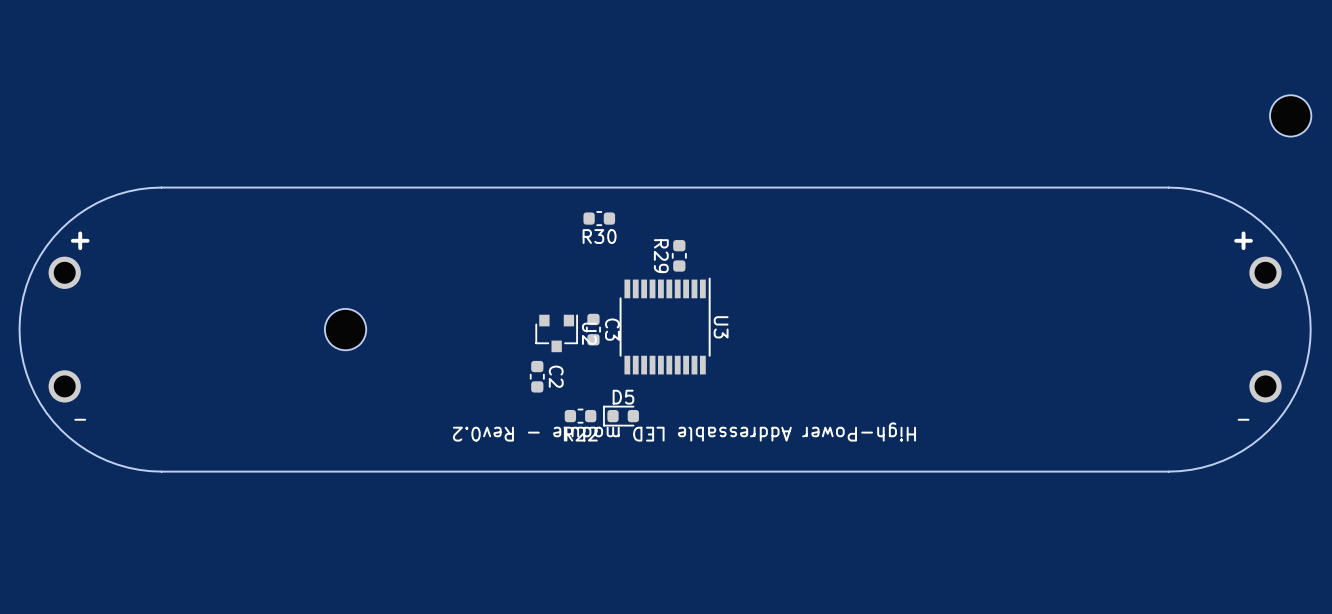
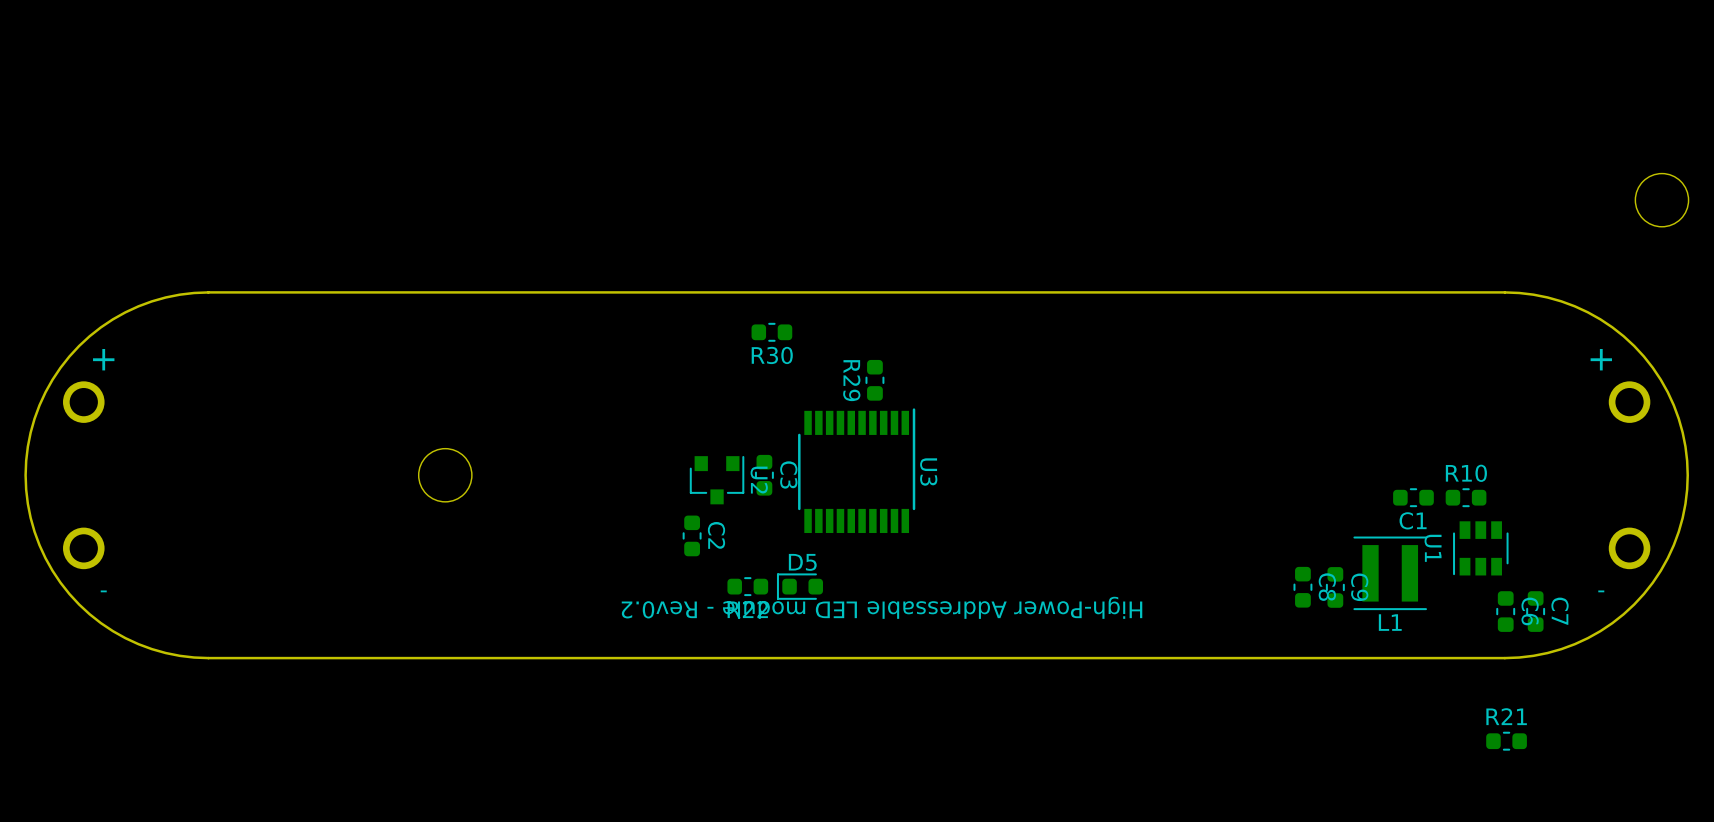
C1: none -> (1413, 497)
R10: none -> (1466, 497)
U1: none -> (1480, 548)
L1: none -> (1390, 573)
C8: none -> (1302, 587)
C9: none -> (1335, 587)
C6: none -> (1505, 611)
C7: none -> (1535, 611)
R21: none -> (1506, 741)

